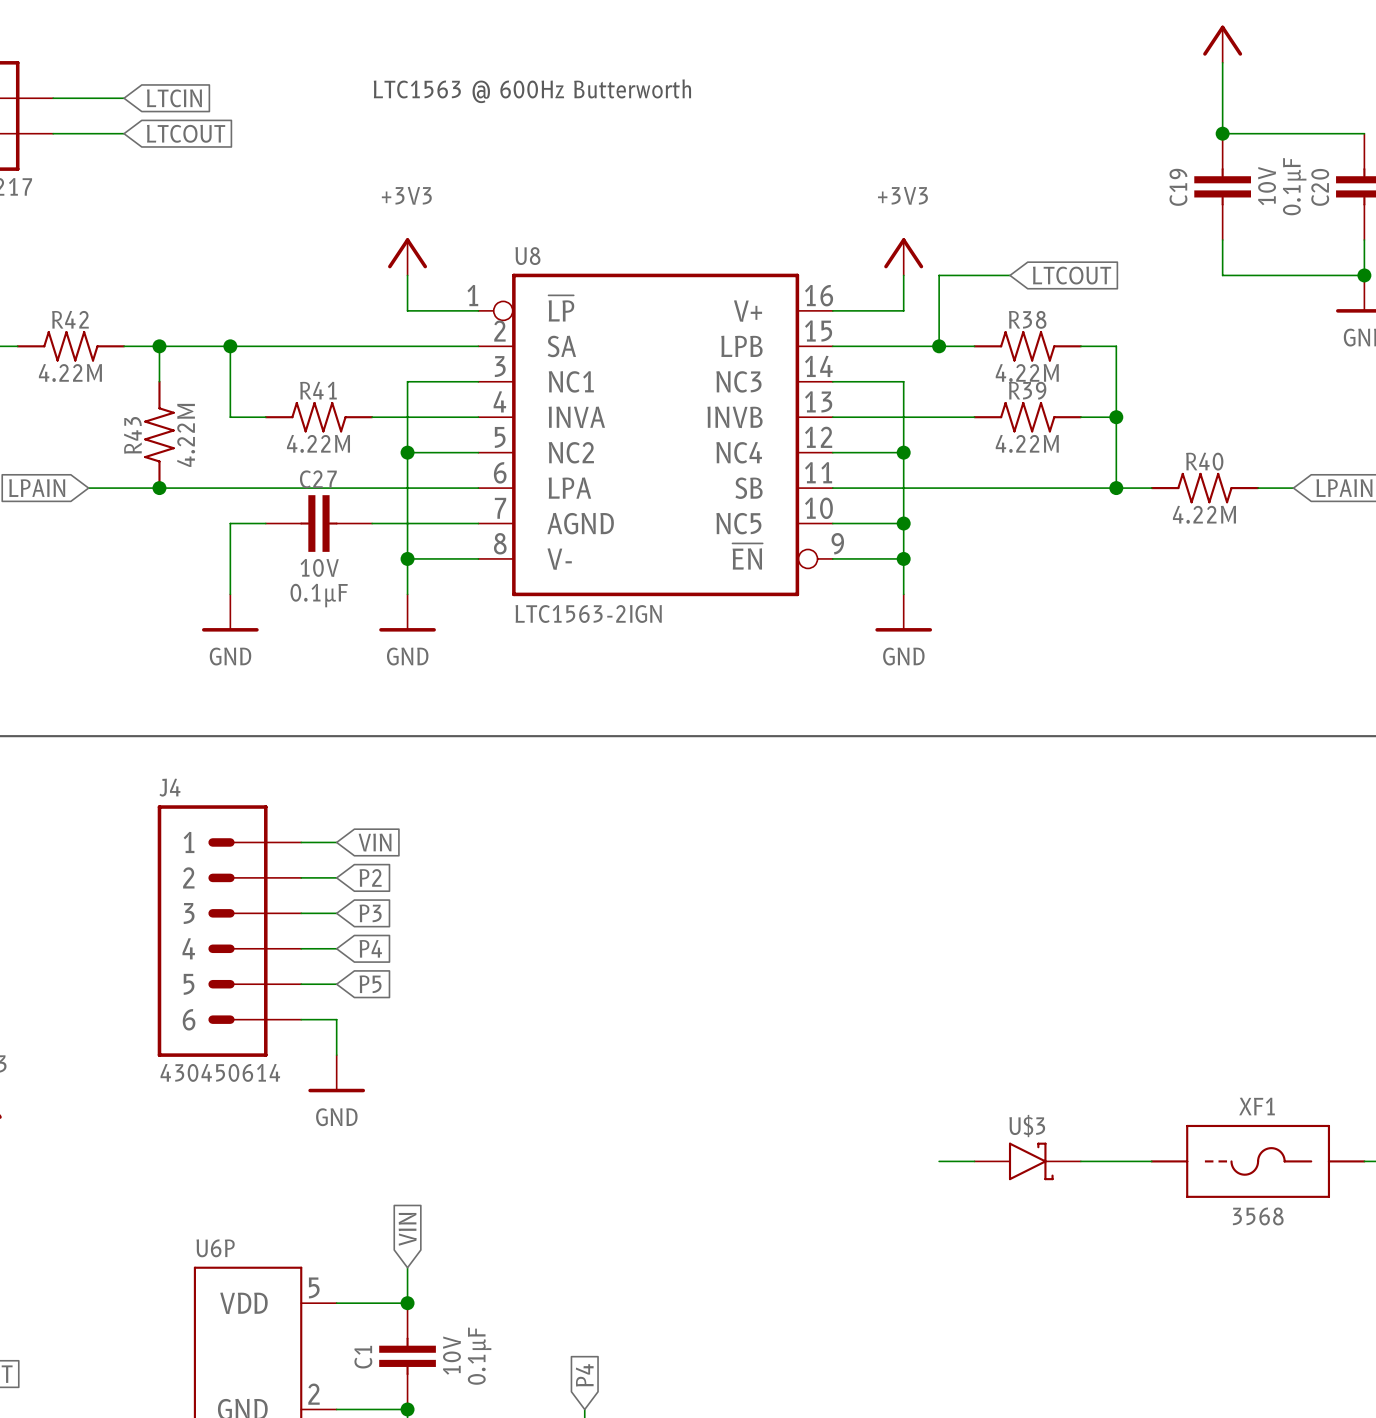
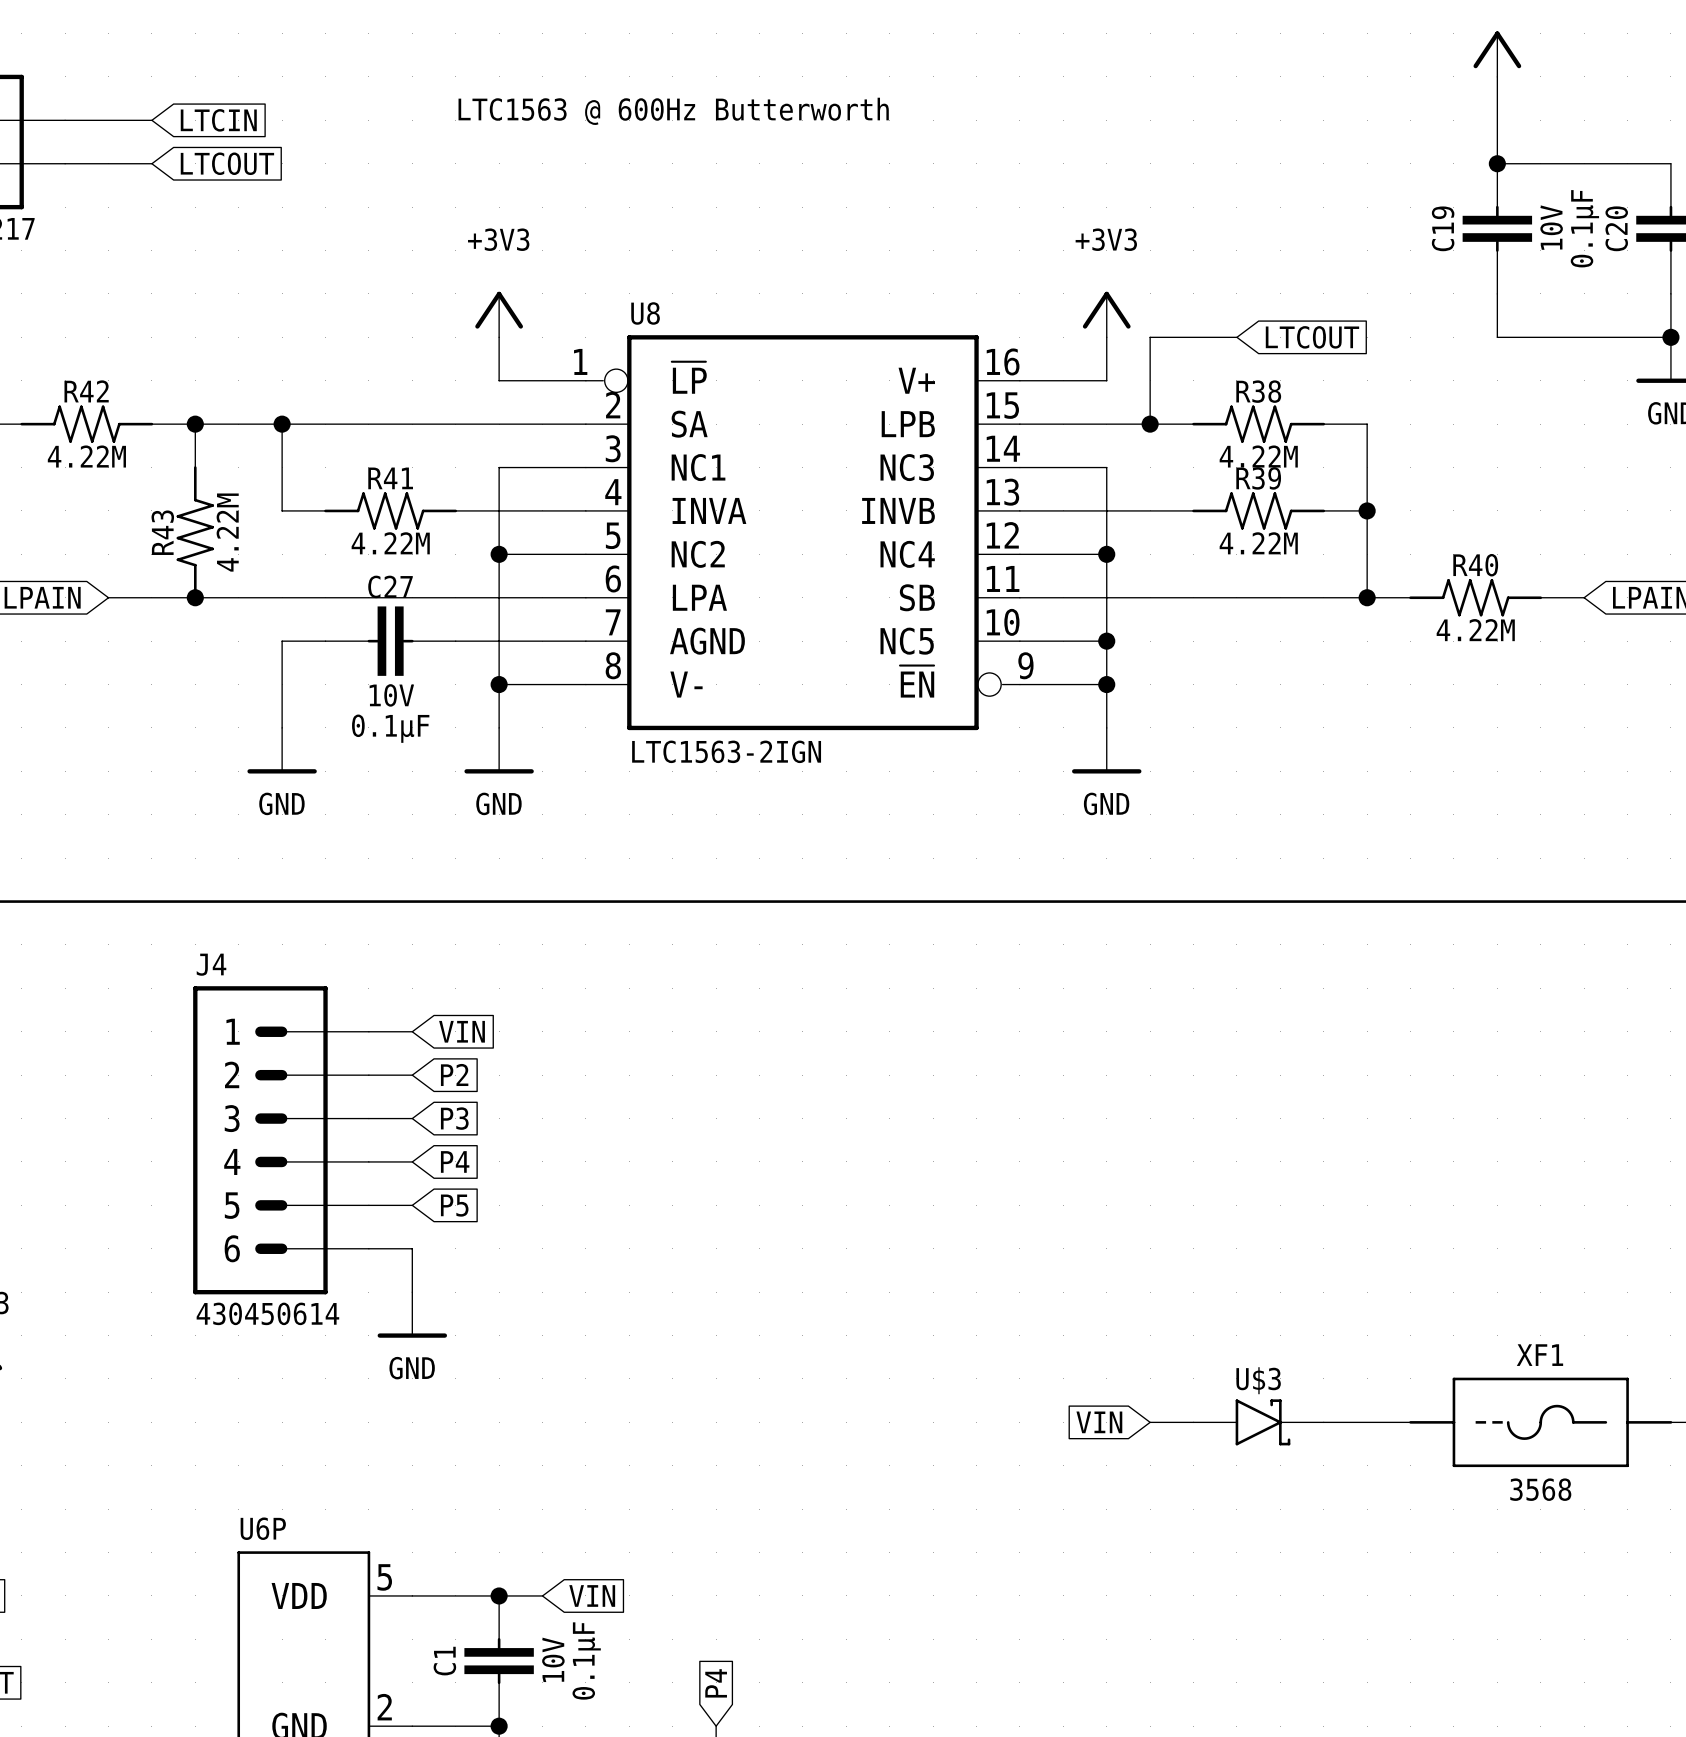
global label: none -> VIN (1099, 1422)
global label rotation: 0° (407, 1229) -> 90° clockwise (592, 1595)
global label position: VIN (407, 1229) -> VIN (592, 1595)
wire: (407, 1267) (407, 1303) -> (542, 1595) (499, 1595)

